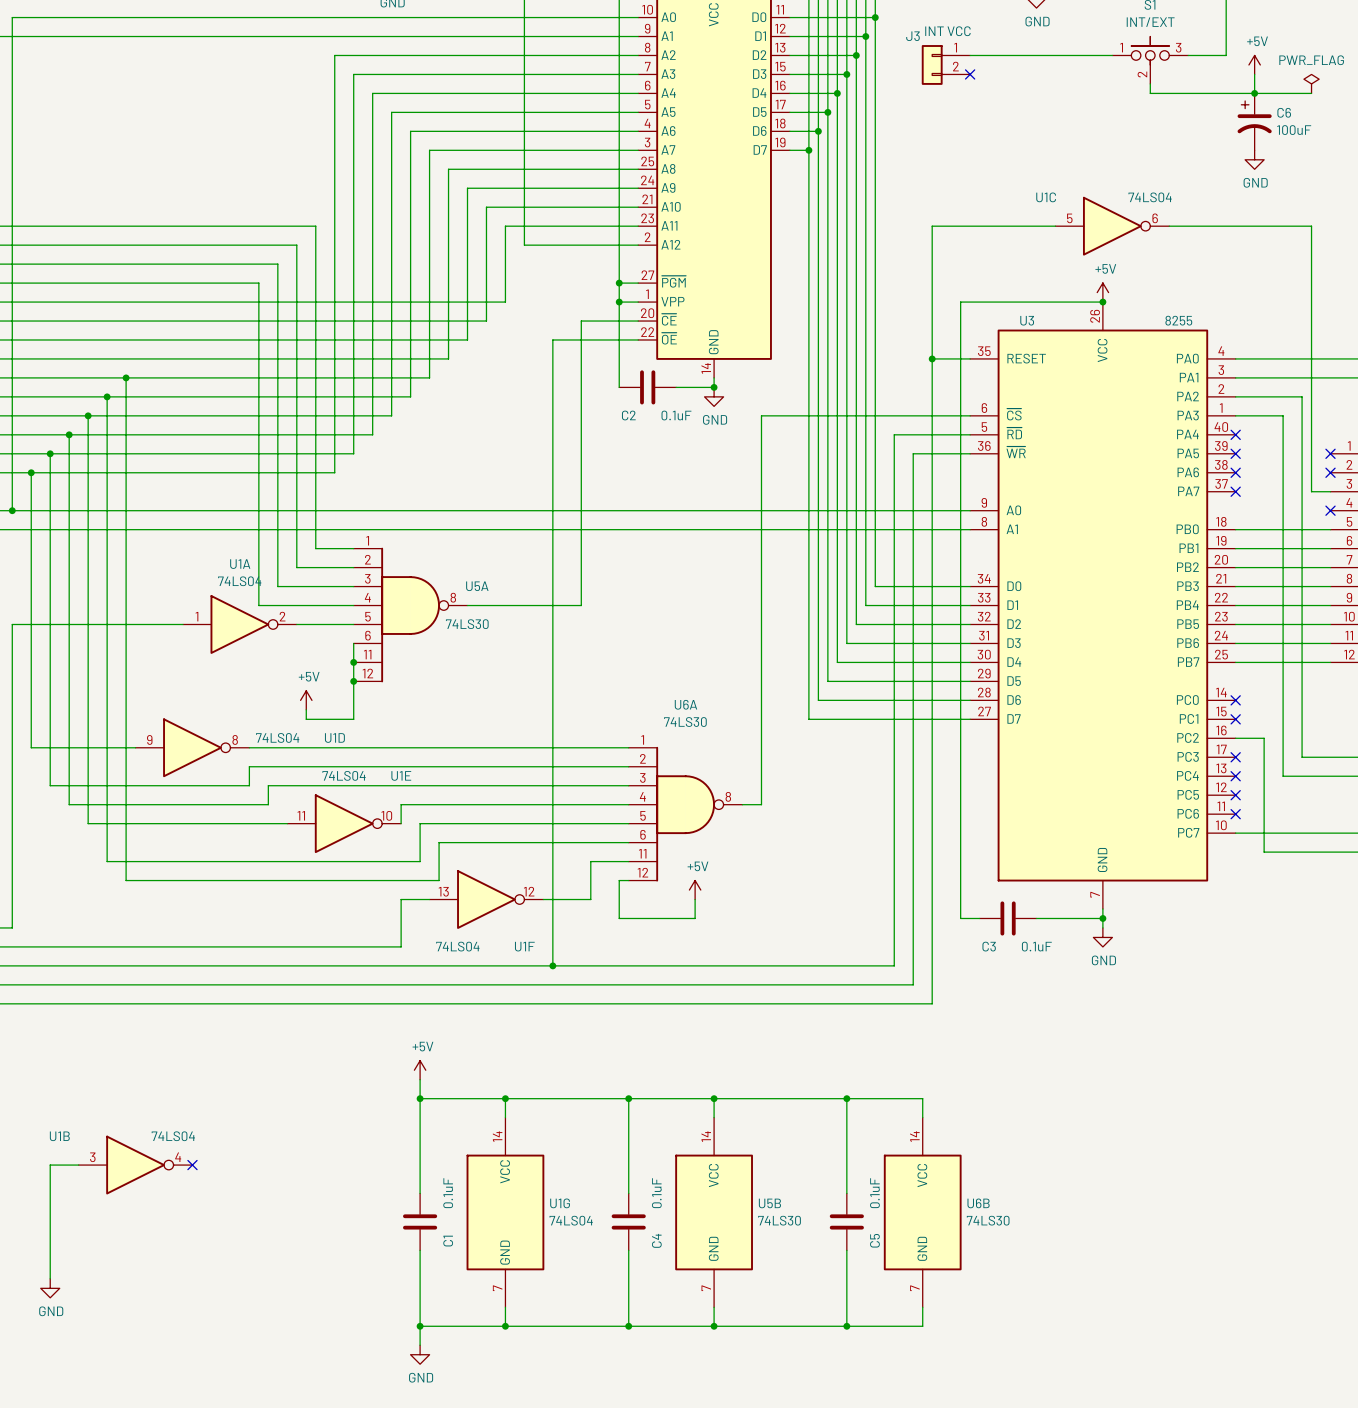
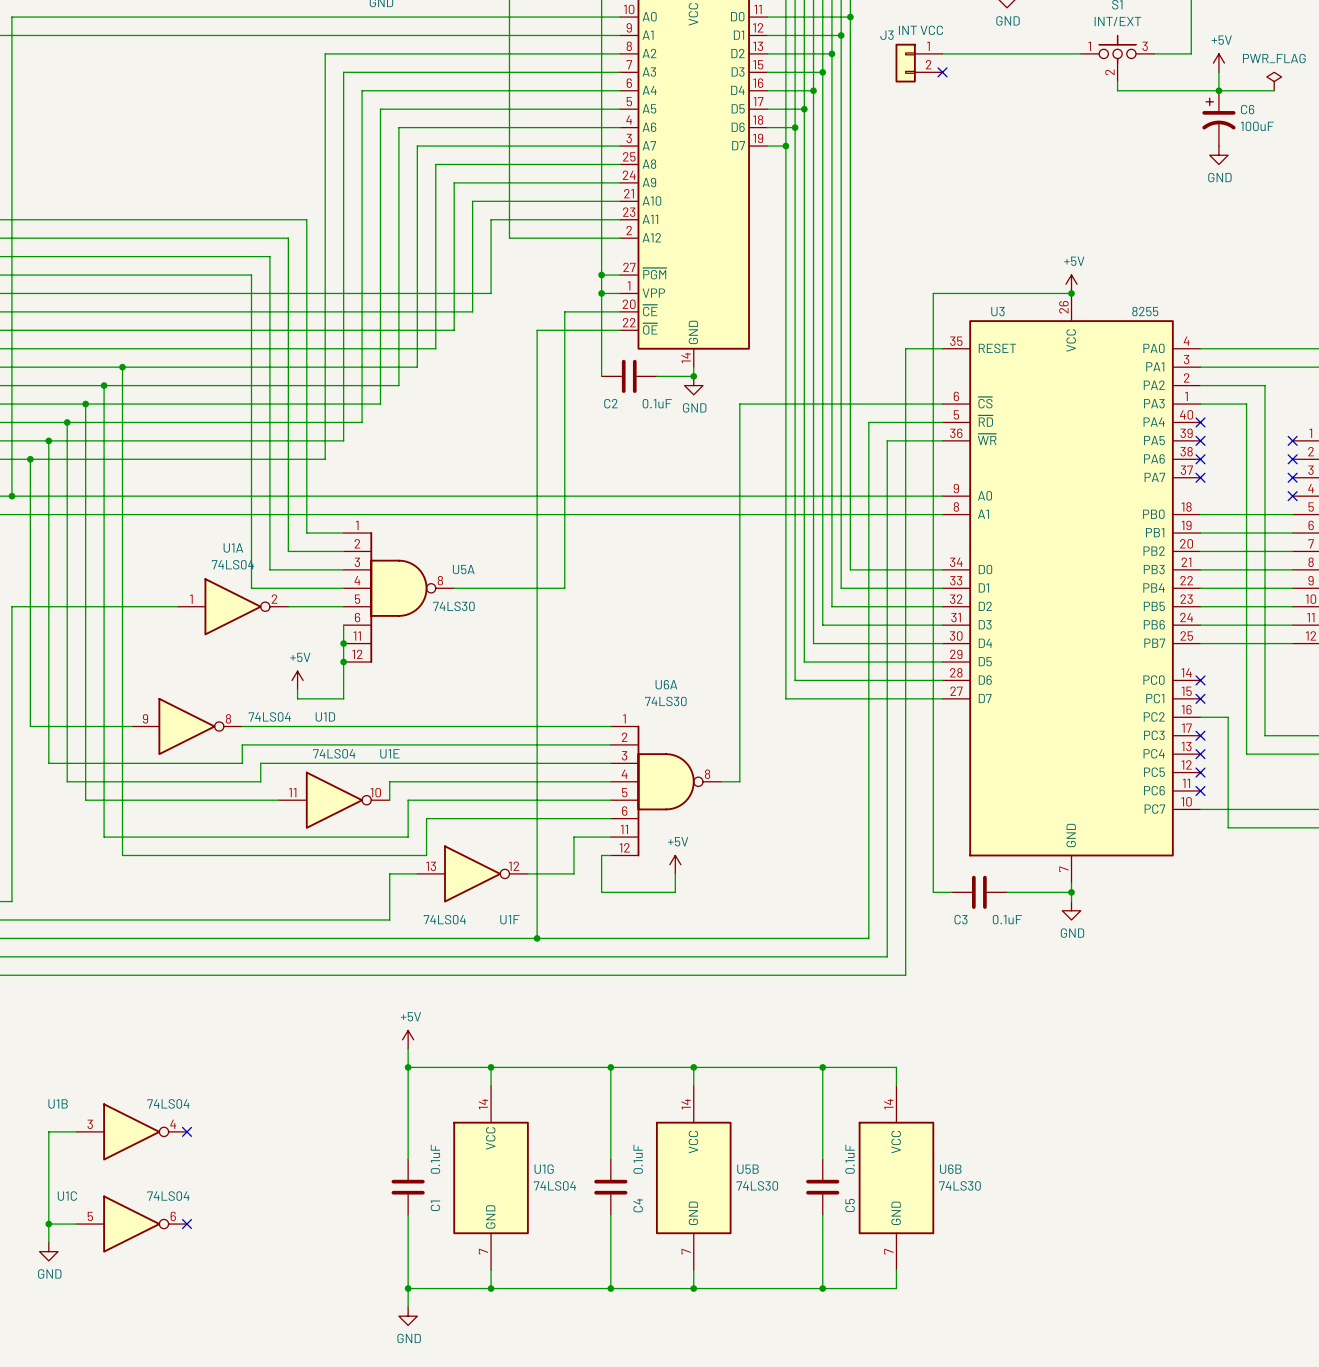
wire: (1055, 226) (932, 226) (932, 358) -> none
U1C position: (1112, 226) -> (131, 1224)
wire: (1169, 226) (1311, 226) (1311, 491) (1330, 491) -> none
junction: (932, 358) -> none
no-connect mark: none -> (1292, 477)
wire: none -> (48, 1224) (76, 1224)
junction: none -> (48, 1224)
no-connect mark: none -> (187, 1224)

